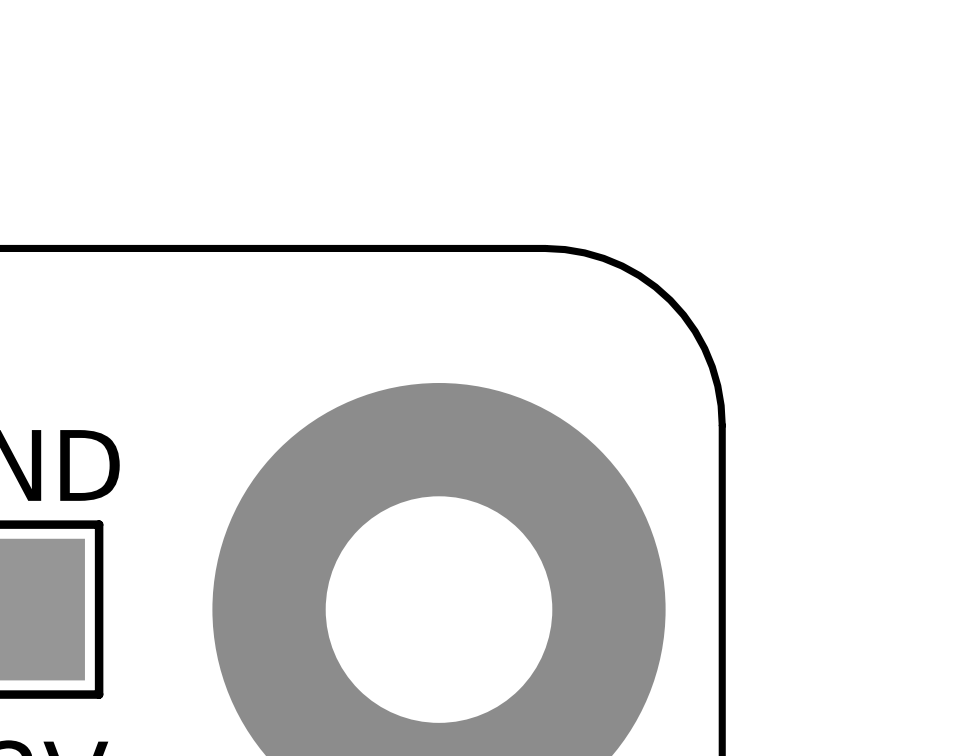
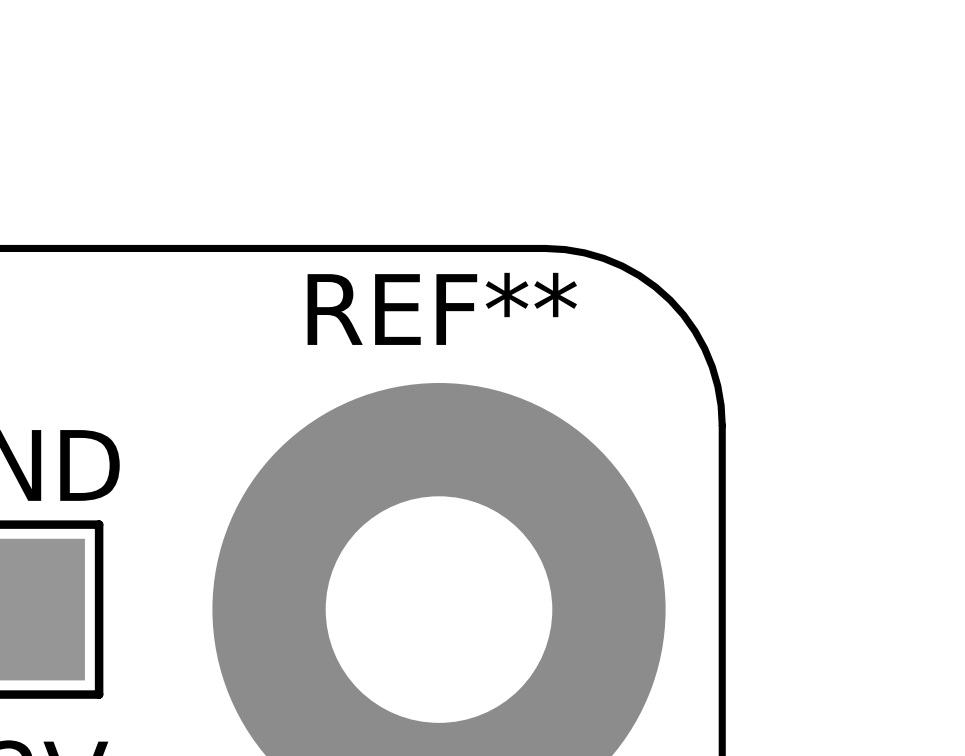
REF** name: none -> REF** (442, 308)

